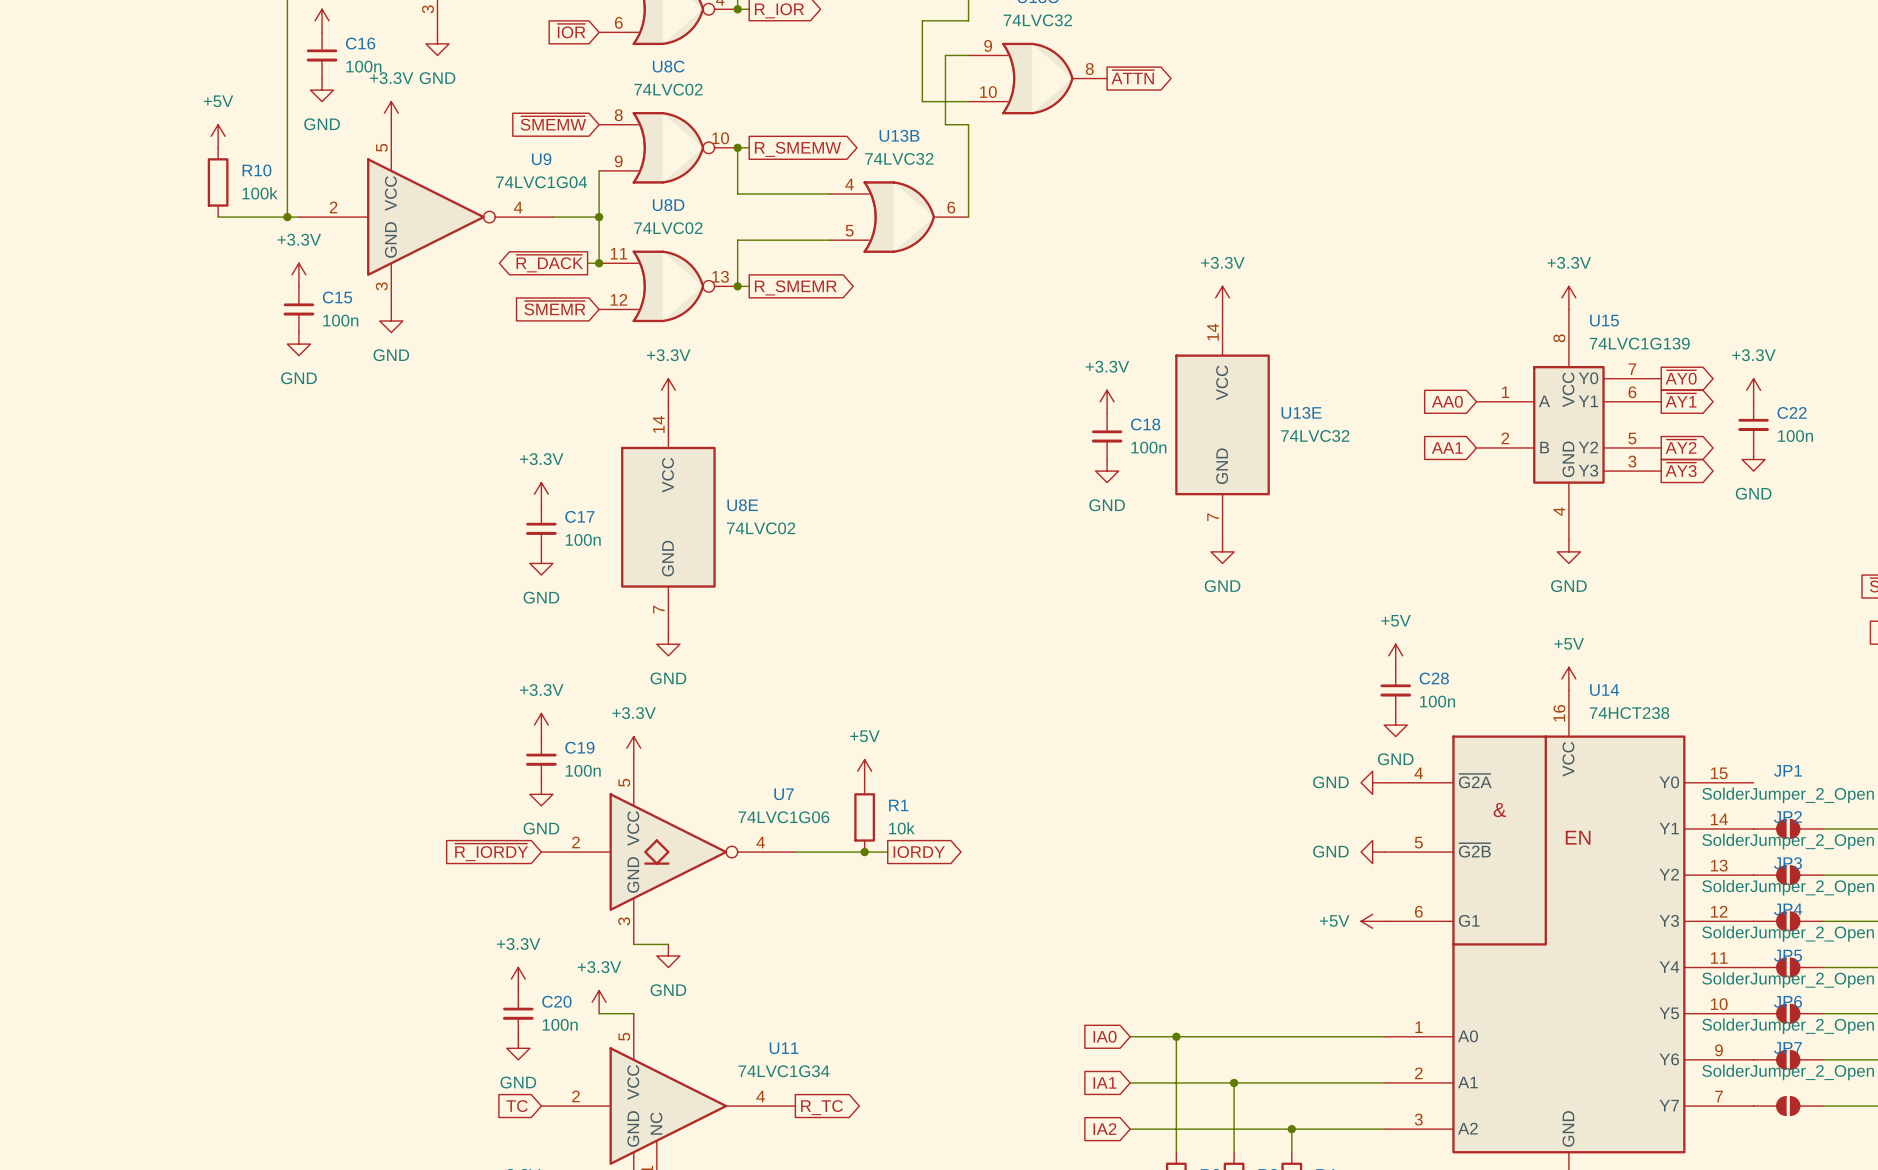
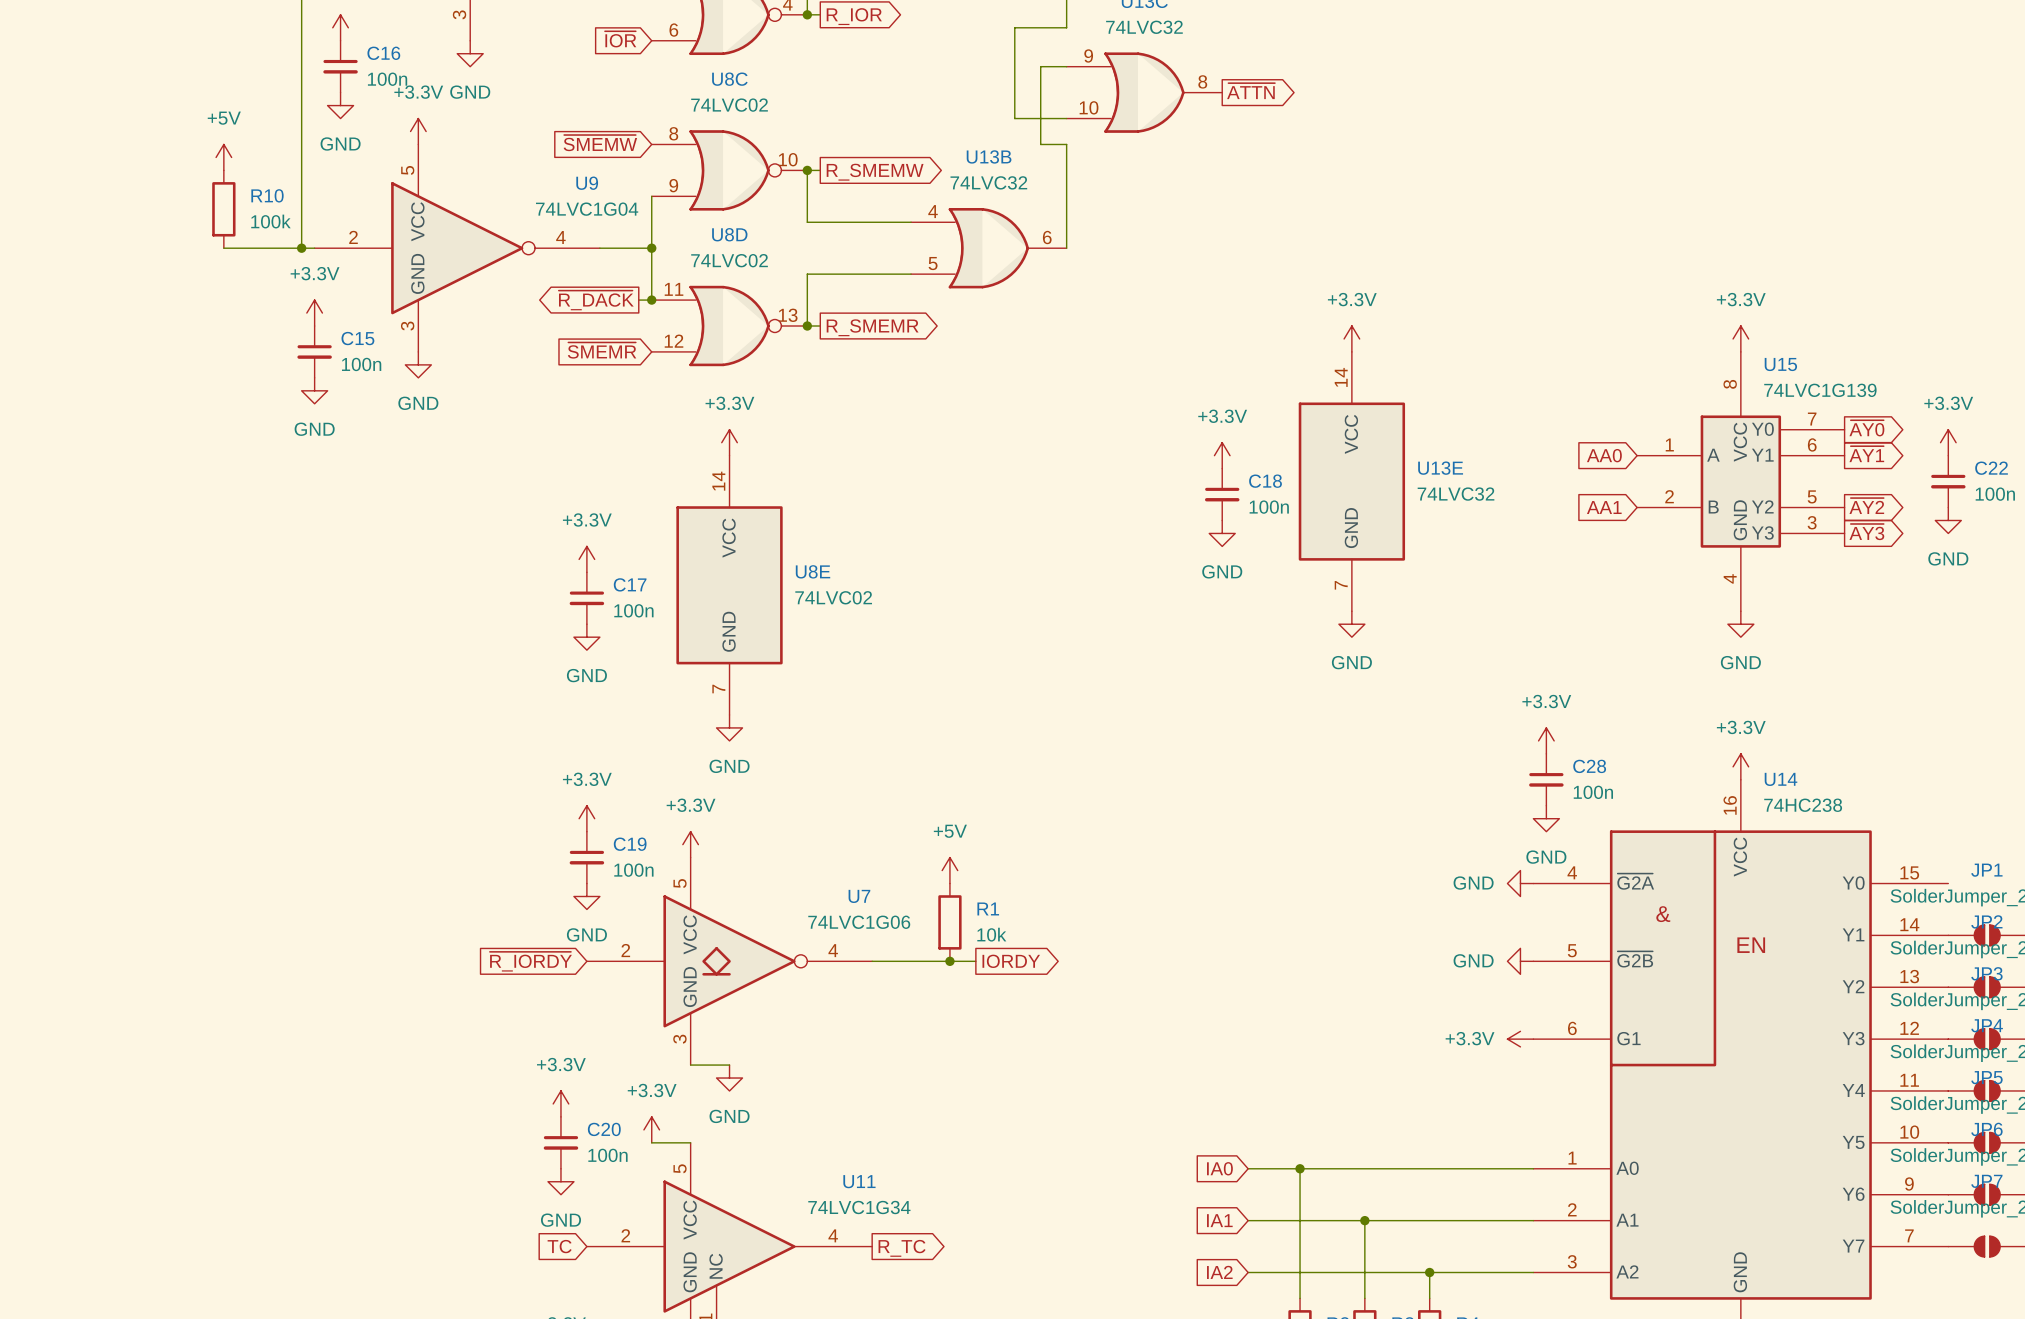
power symbol: +5V (1395, 655) -> +3.3V (1546, 740)
power symbol: +5V (1568, 678) -> +3.3V (1740, 766)
U14 value: 74HCT238 (1629, 713) -> 74HC238 (1803, 805)
power symbol: +5V (1372, 921) -> +3.3V (1520, 1039)

